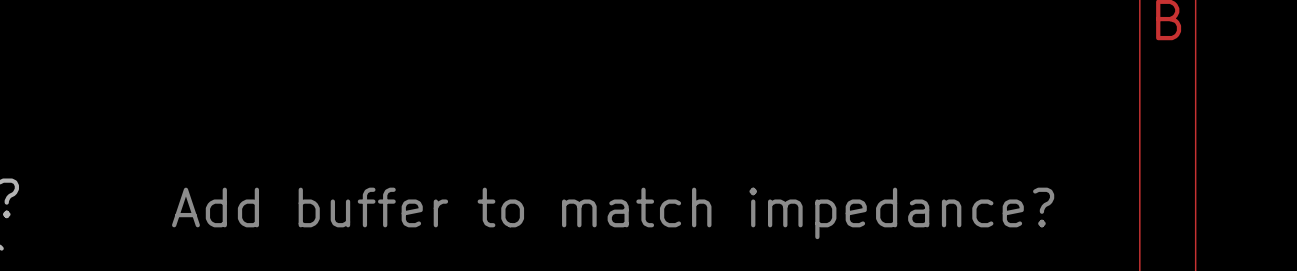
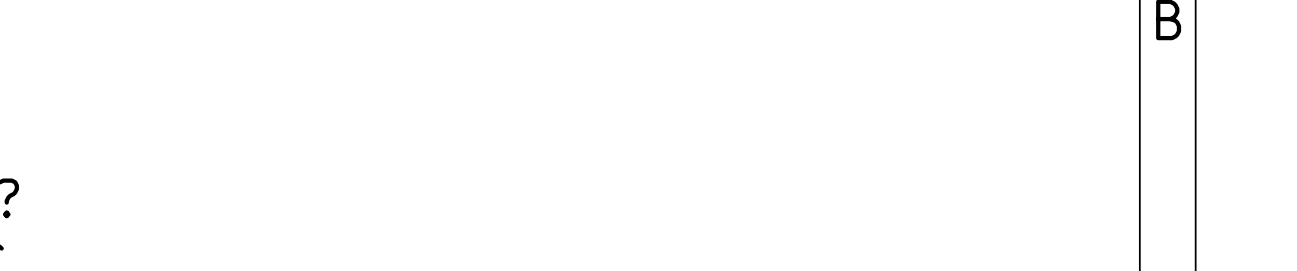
text: Add buffer to match impedance? (613, 213) -> none

